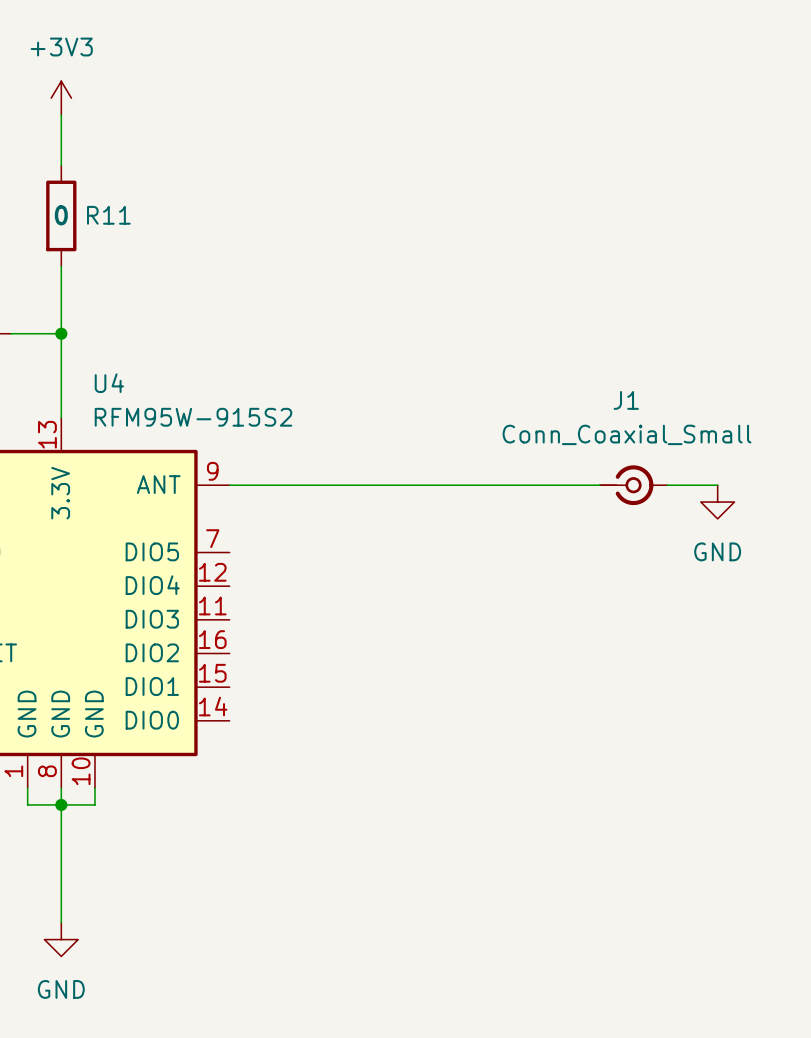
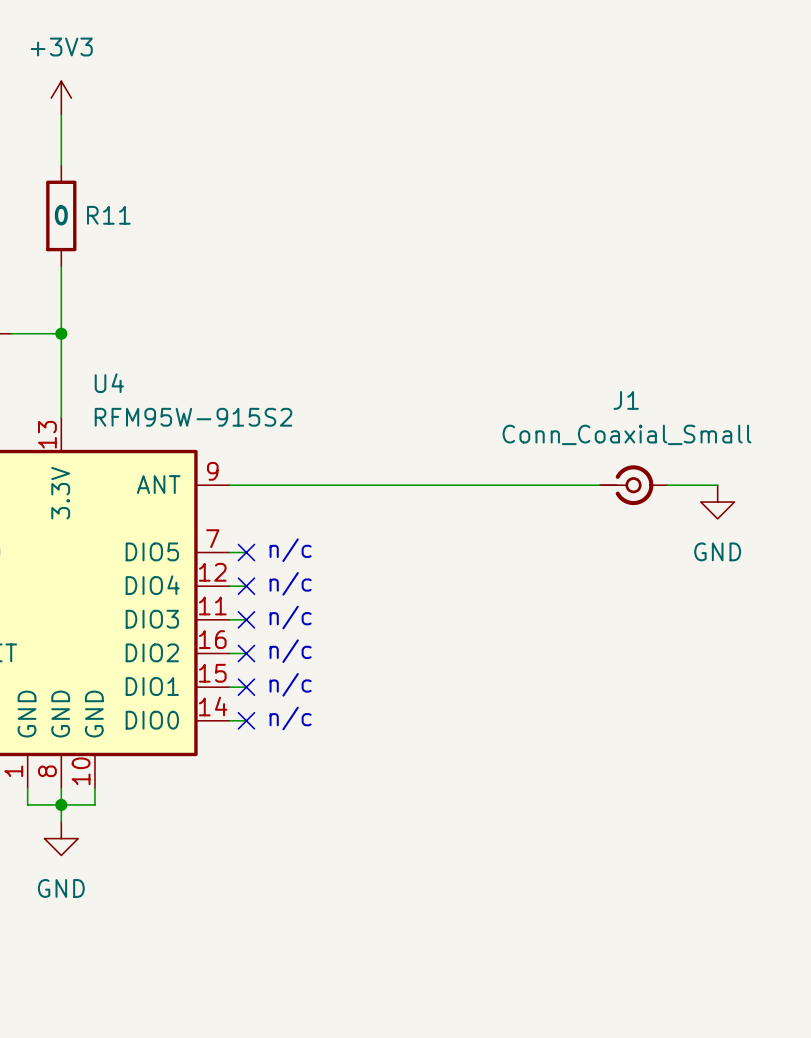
text: none -> n/c (290, 550)
wire: none -> (229, 552) (246, 552)
no-connect mark: none -> (246, 552)
text: none -> n/c (290, 583)
wire: none -> (229, 586) (246, 586)
no-connect mark: none -> (246, 586)
text: none -> n/c (290, 617)
wire: none -> (229, 619) (246, 619)
no-connect mark: none -> (246, 619)
text: none -> n/c (290, 651)
wire: none -> (229, 653) (246, 653)
no-connect mark: none -> (246, 653)
text: none -> n/c (290, 684)
wire: none -> (229, 687) (246, 687)
no-connect mark: none -> (246, 687)
text: none -> n/c (290, 718)
wire: none -> (229, 720) (246, 720)
no-connect mark: none -> (246, 720)
wire: (61, 821) (61, 922) -> none
power symbol position: GND (61, 939) -> GND (61, 838)

